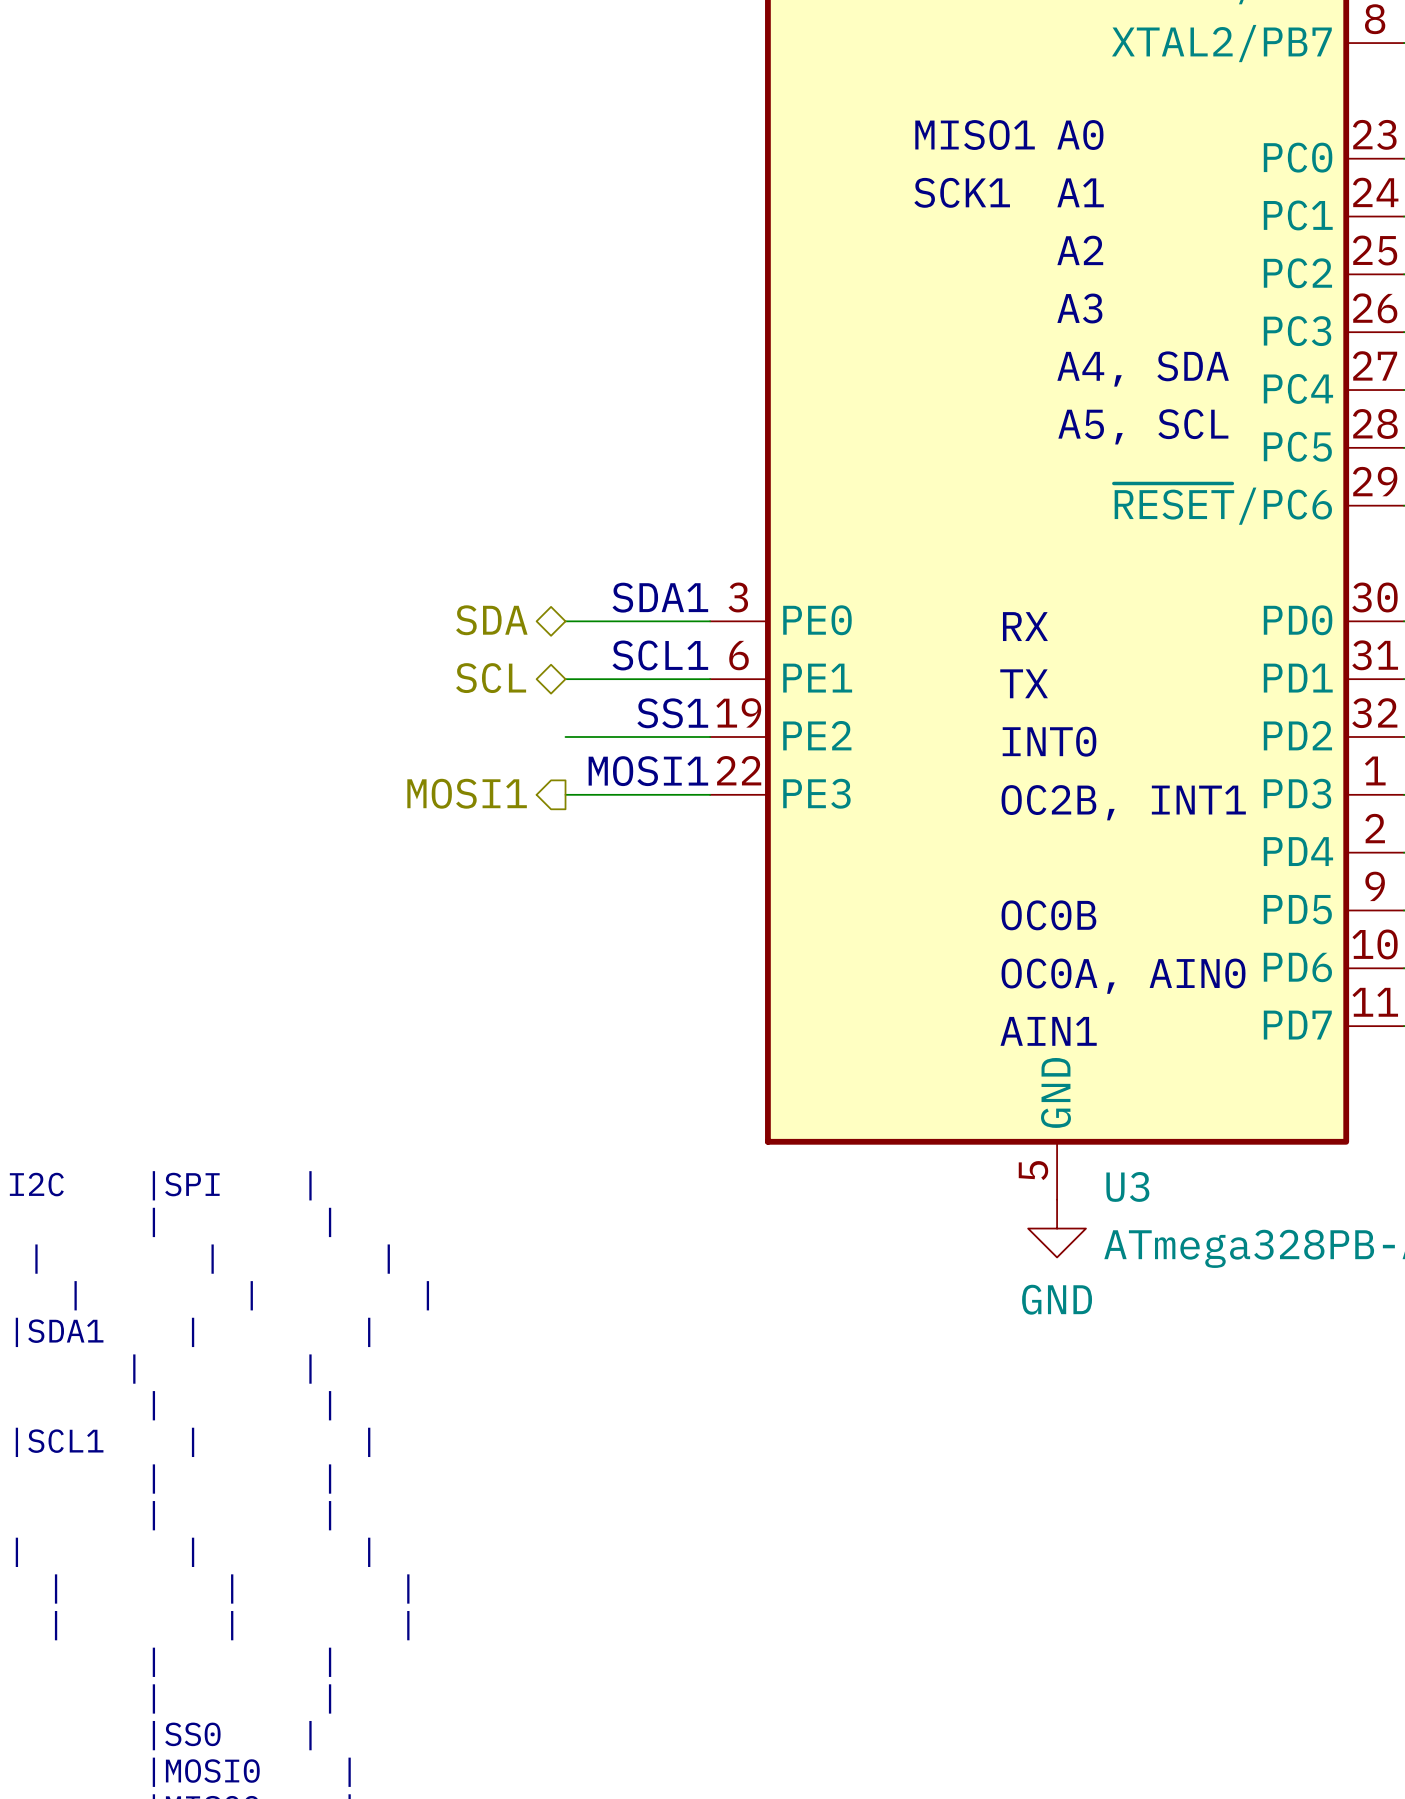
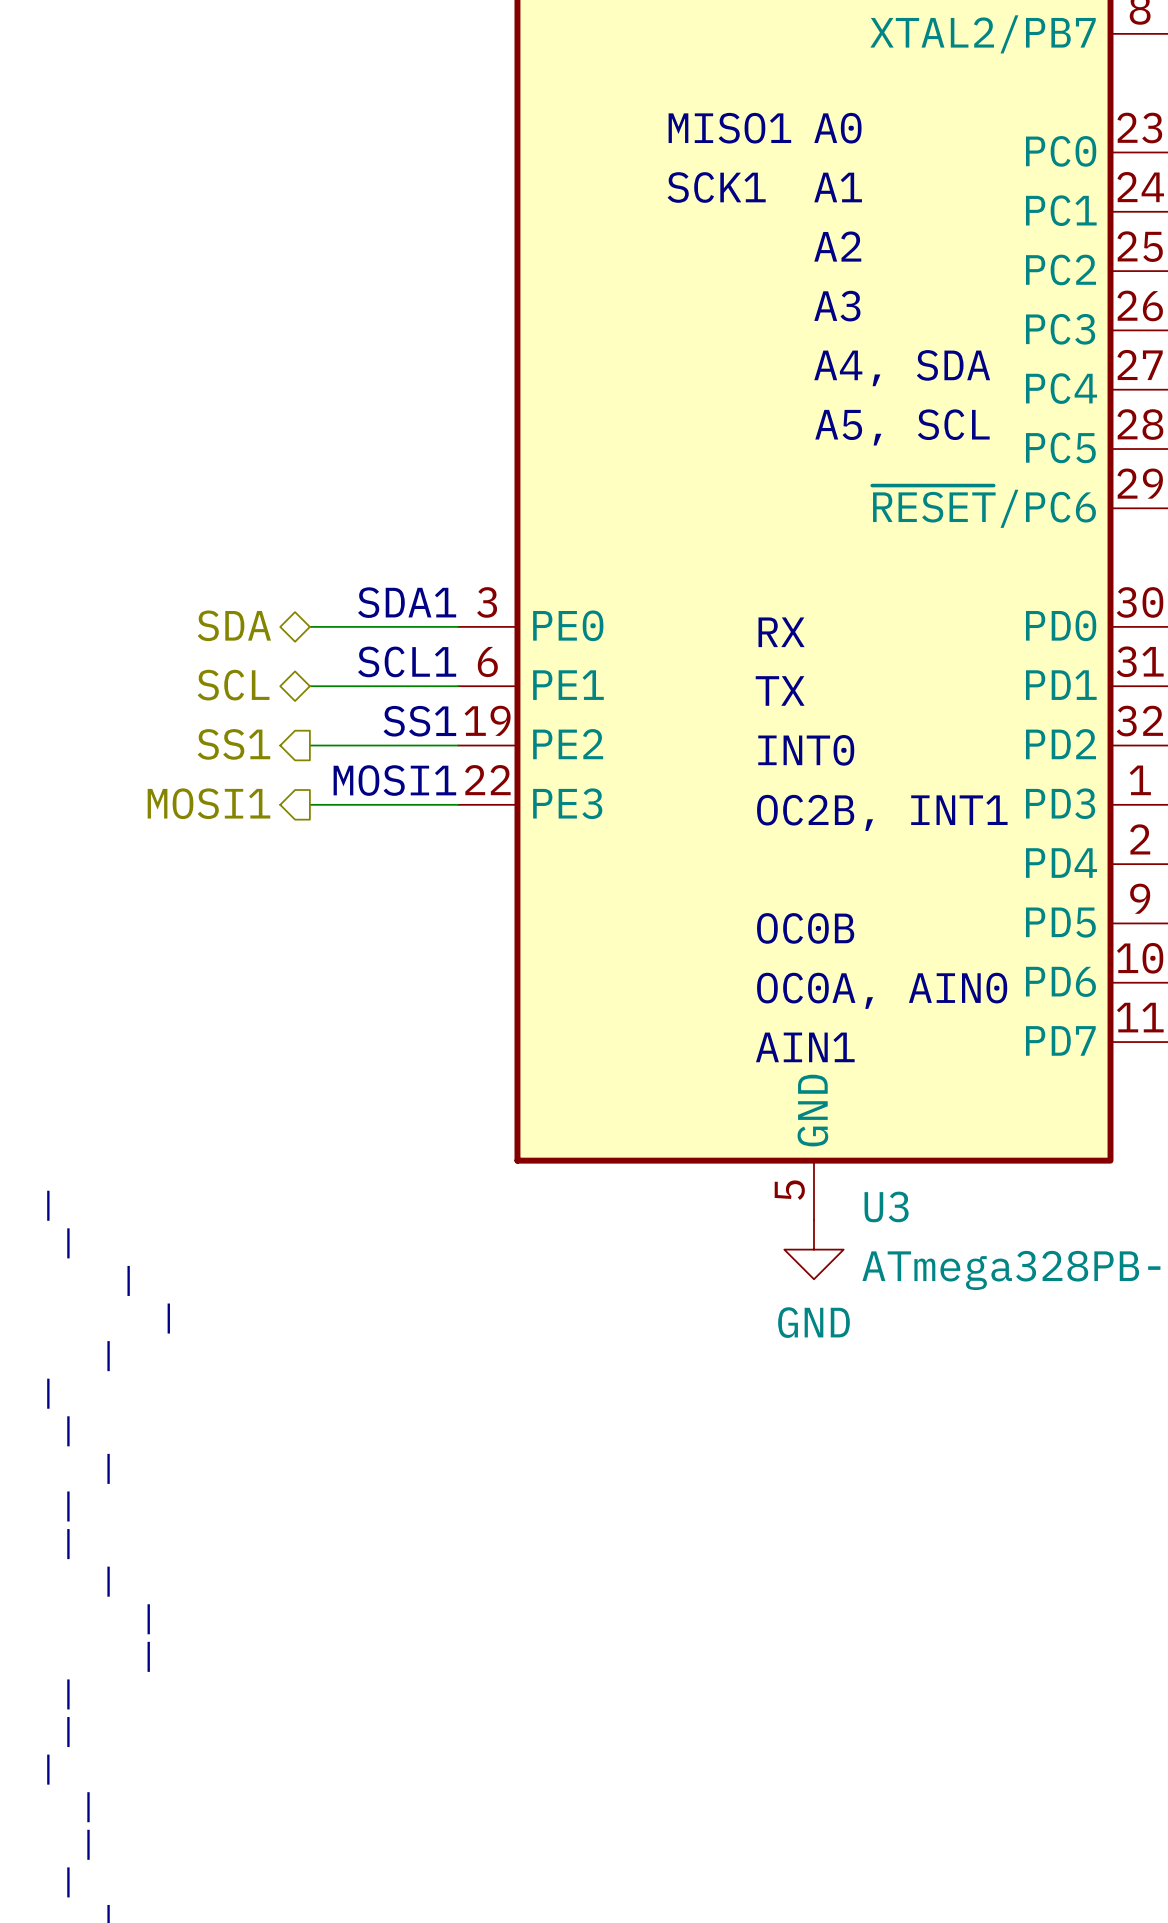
hierarchical label: none -> SS1 (233, 744)

